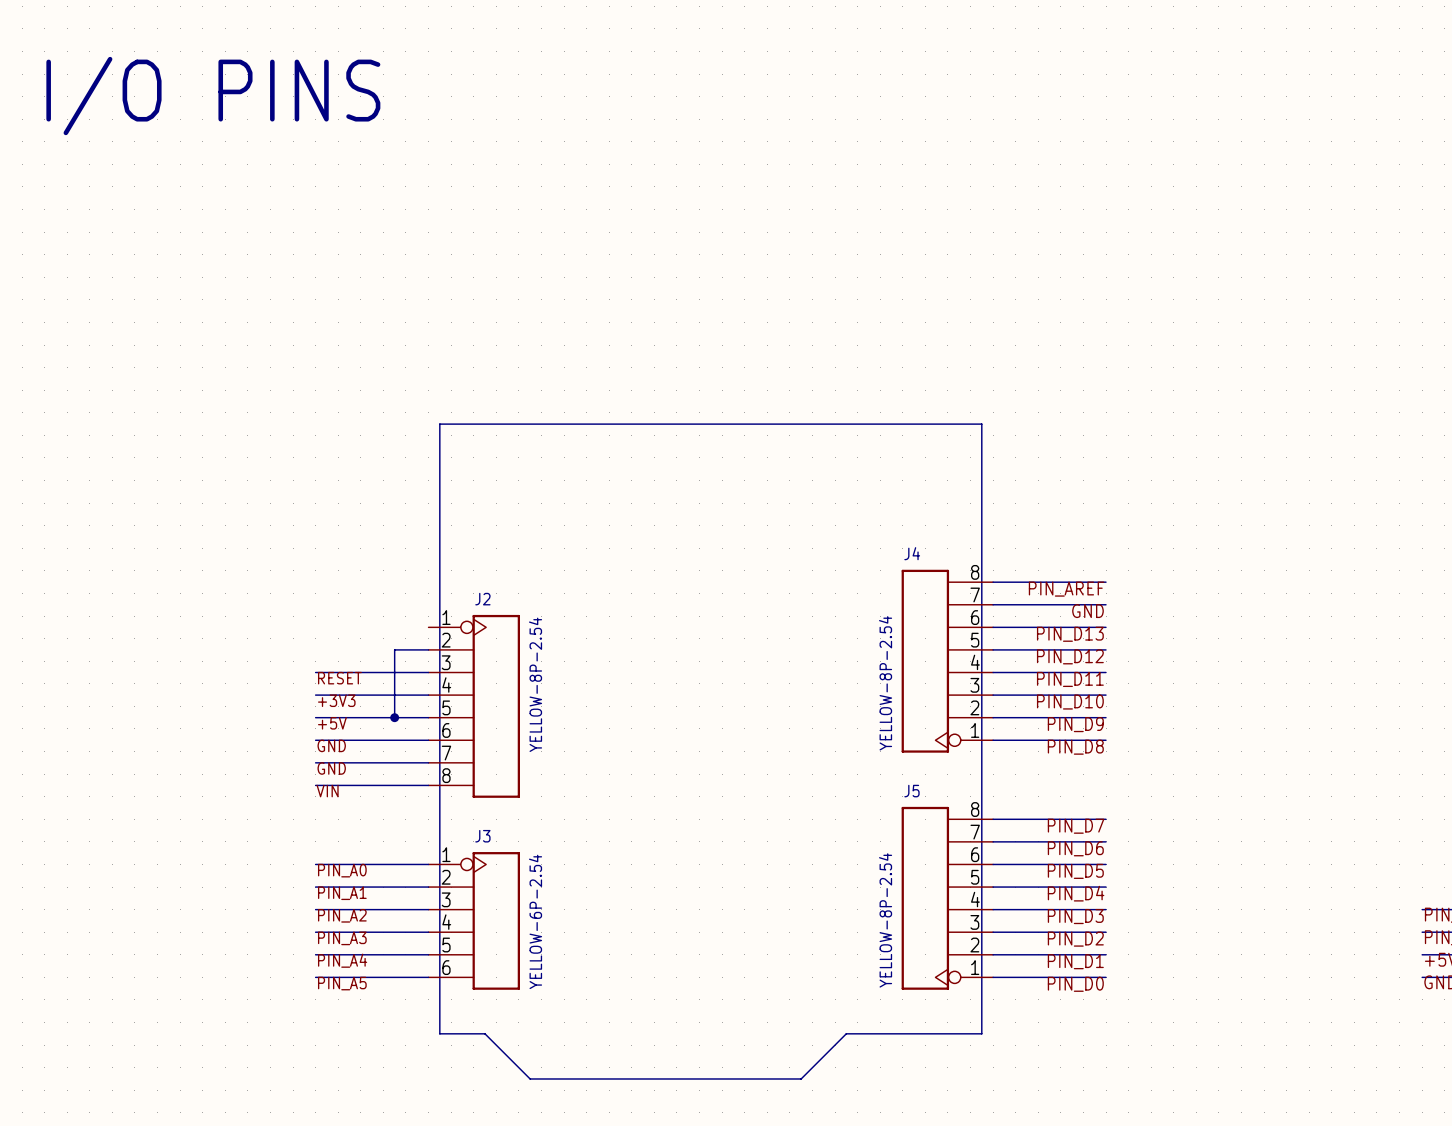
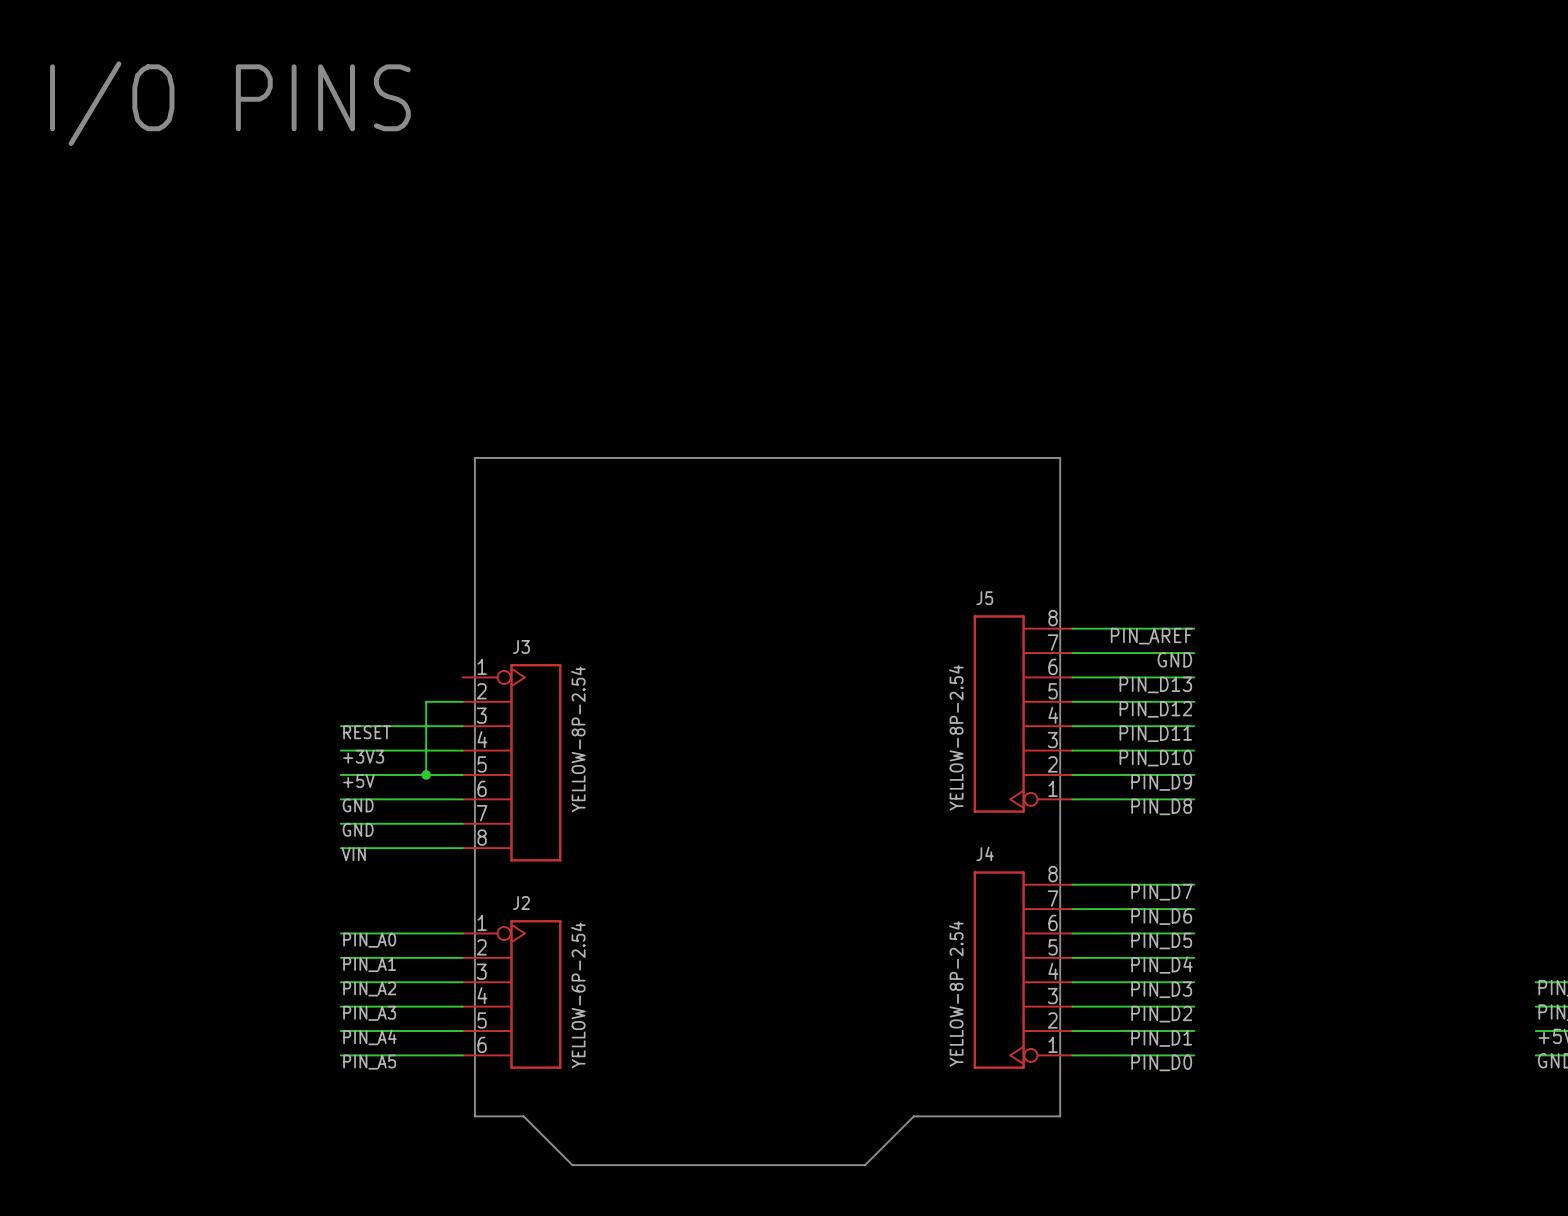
J4 name: J4 (912, 553) -> J5 (984, 598)
J2 name: J2 (482, 599) -> J3 (521, 646)
J5 name: J5 (911, 791) -> J4 (985, 853)
J3 name: J3 (482, 836) -> J2 (521, 903)

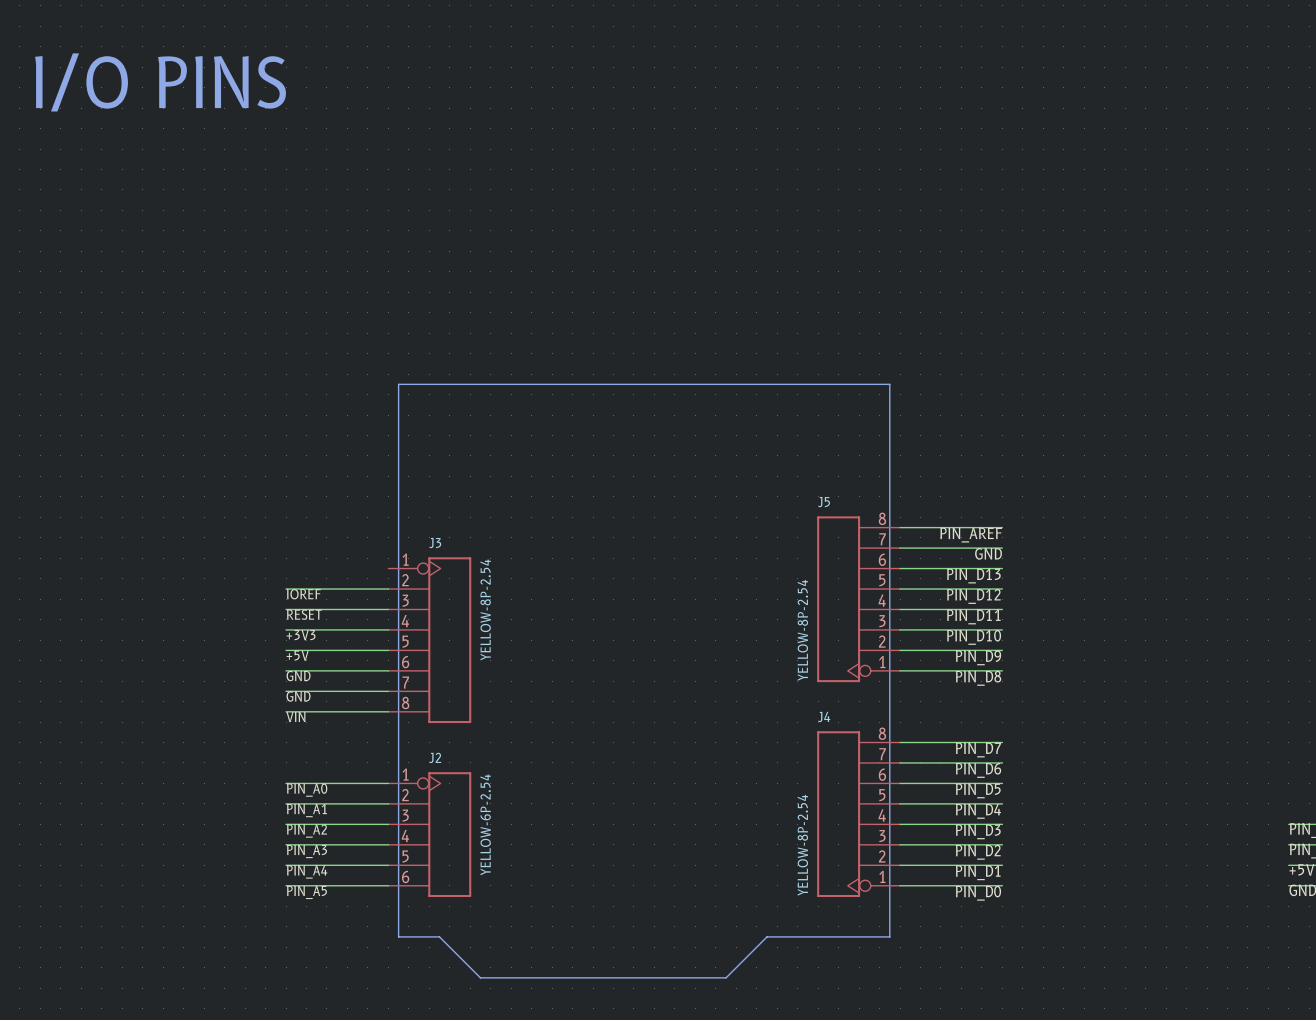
wire: (426, 701) (426, 774) -> (357, 589) (286, 589)
label: none -> IOREF (303, 594)
junction: (426, 774) -> none

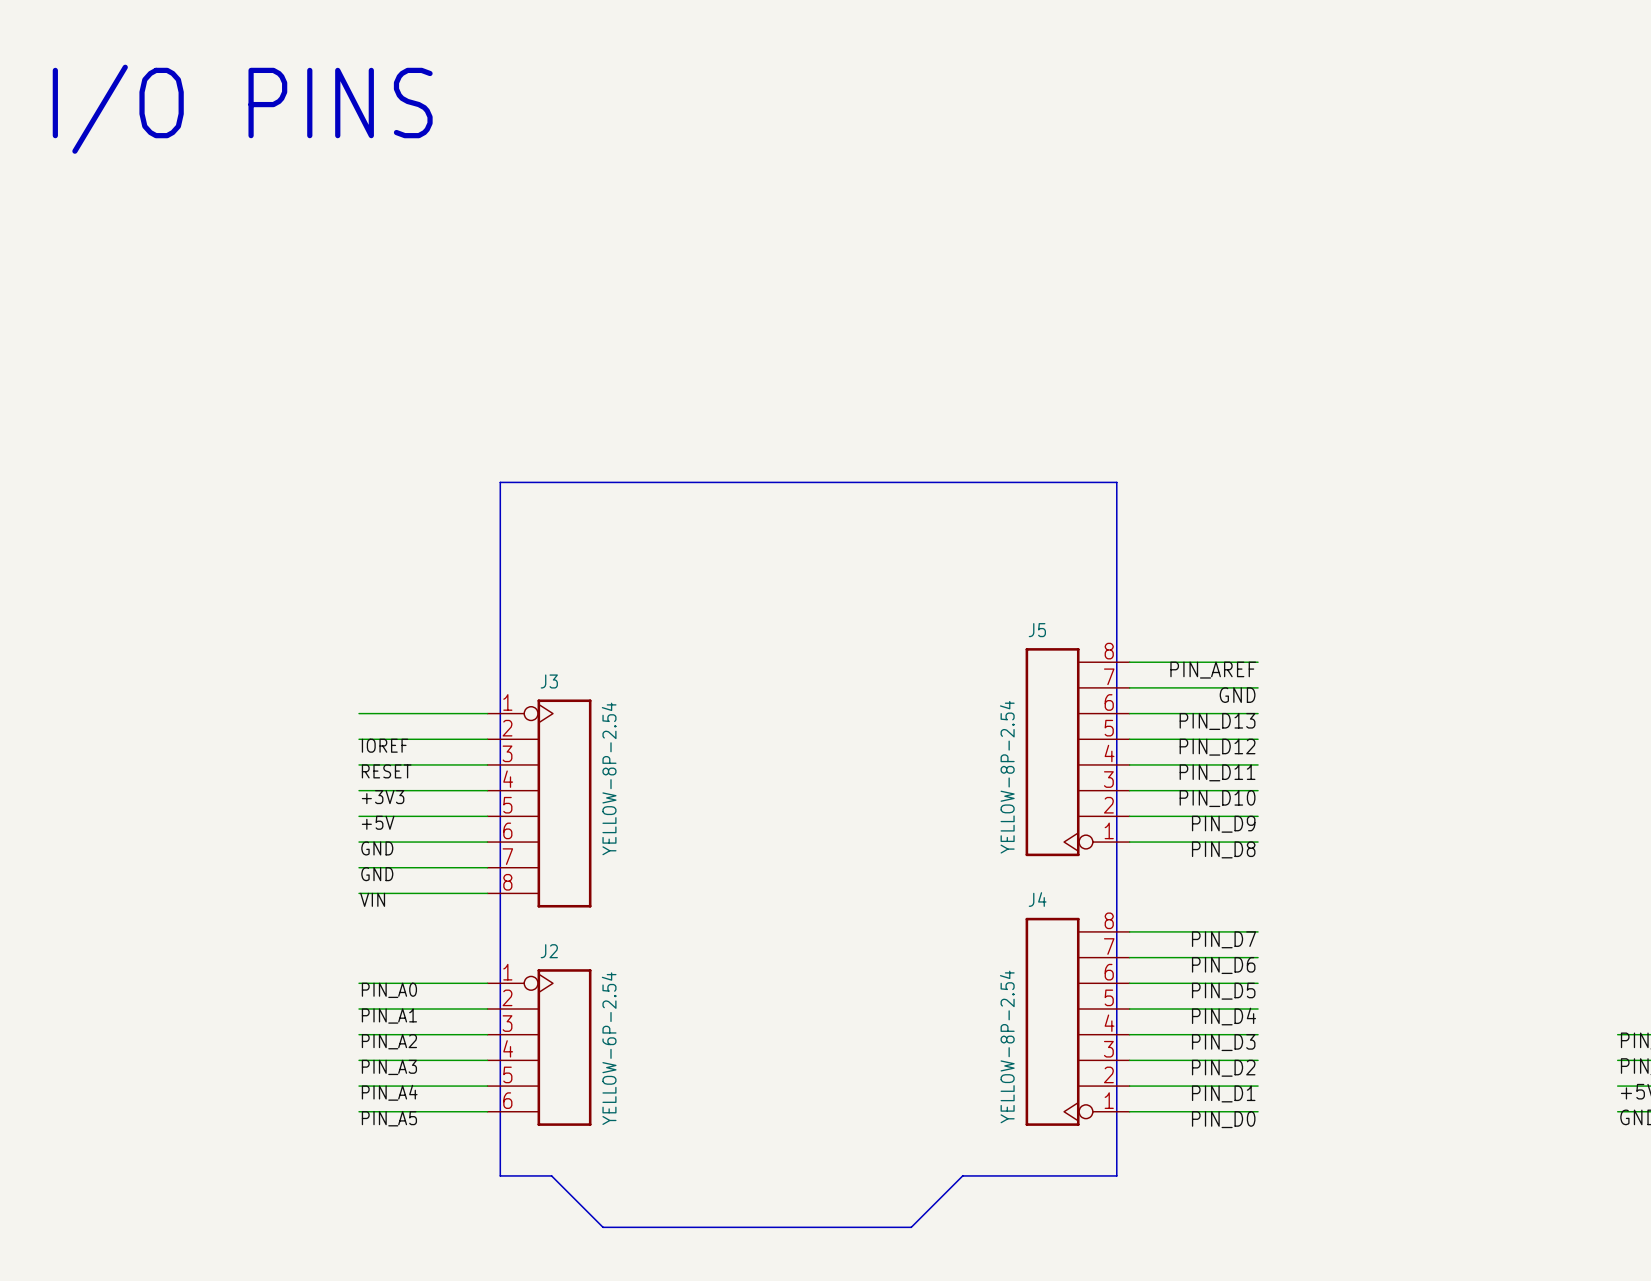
wire: none -> (359, 713) (487, 713)

